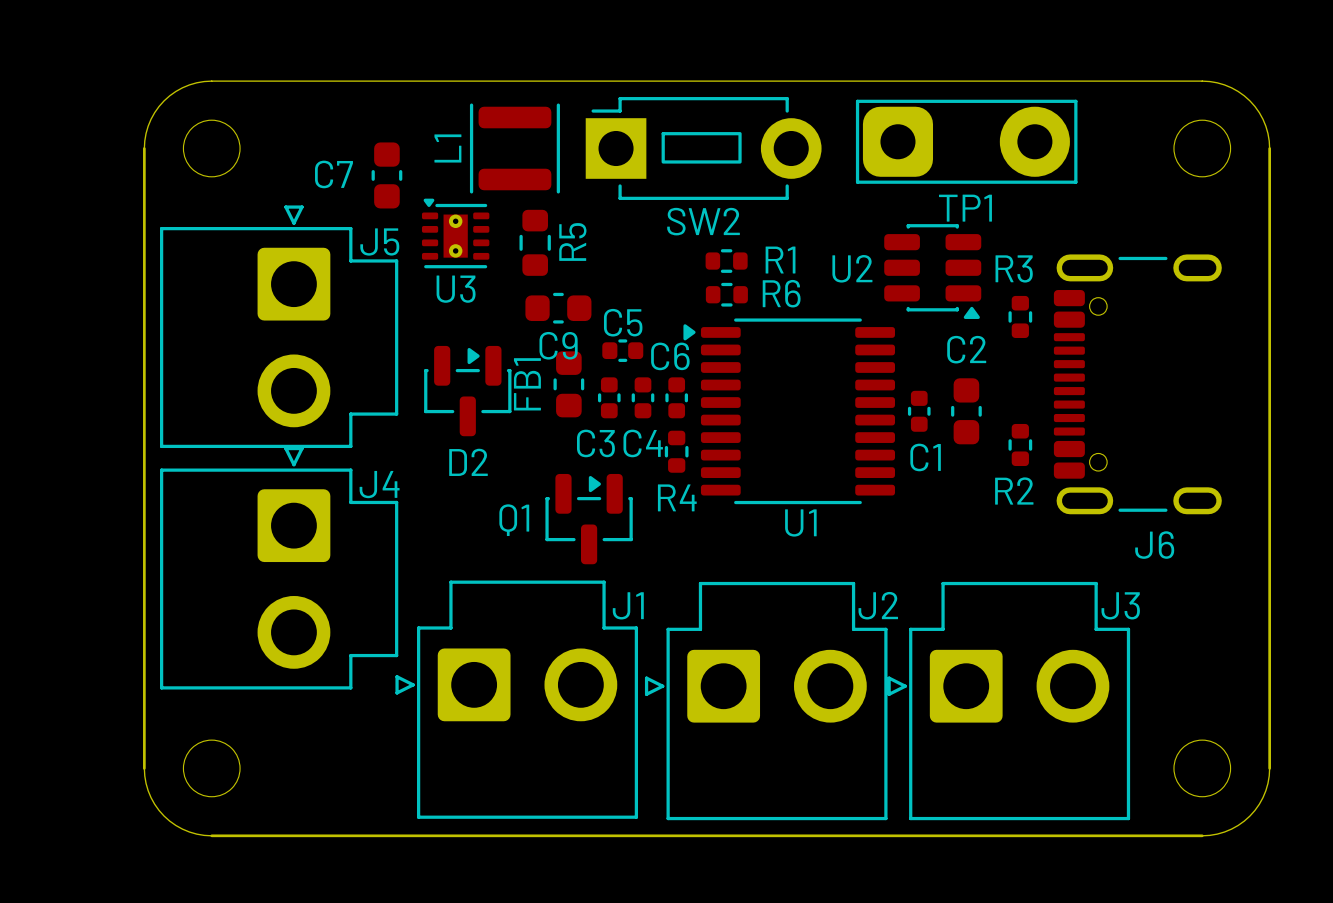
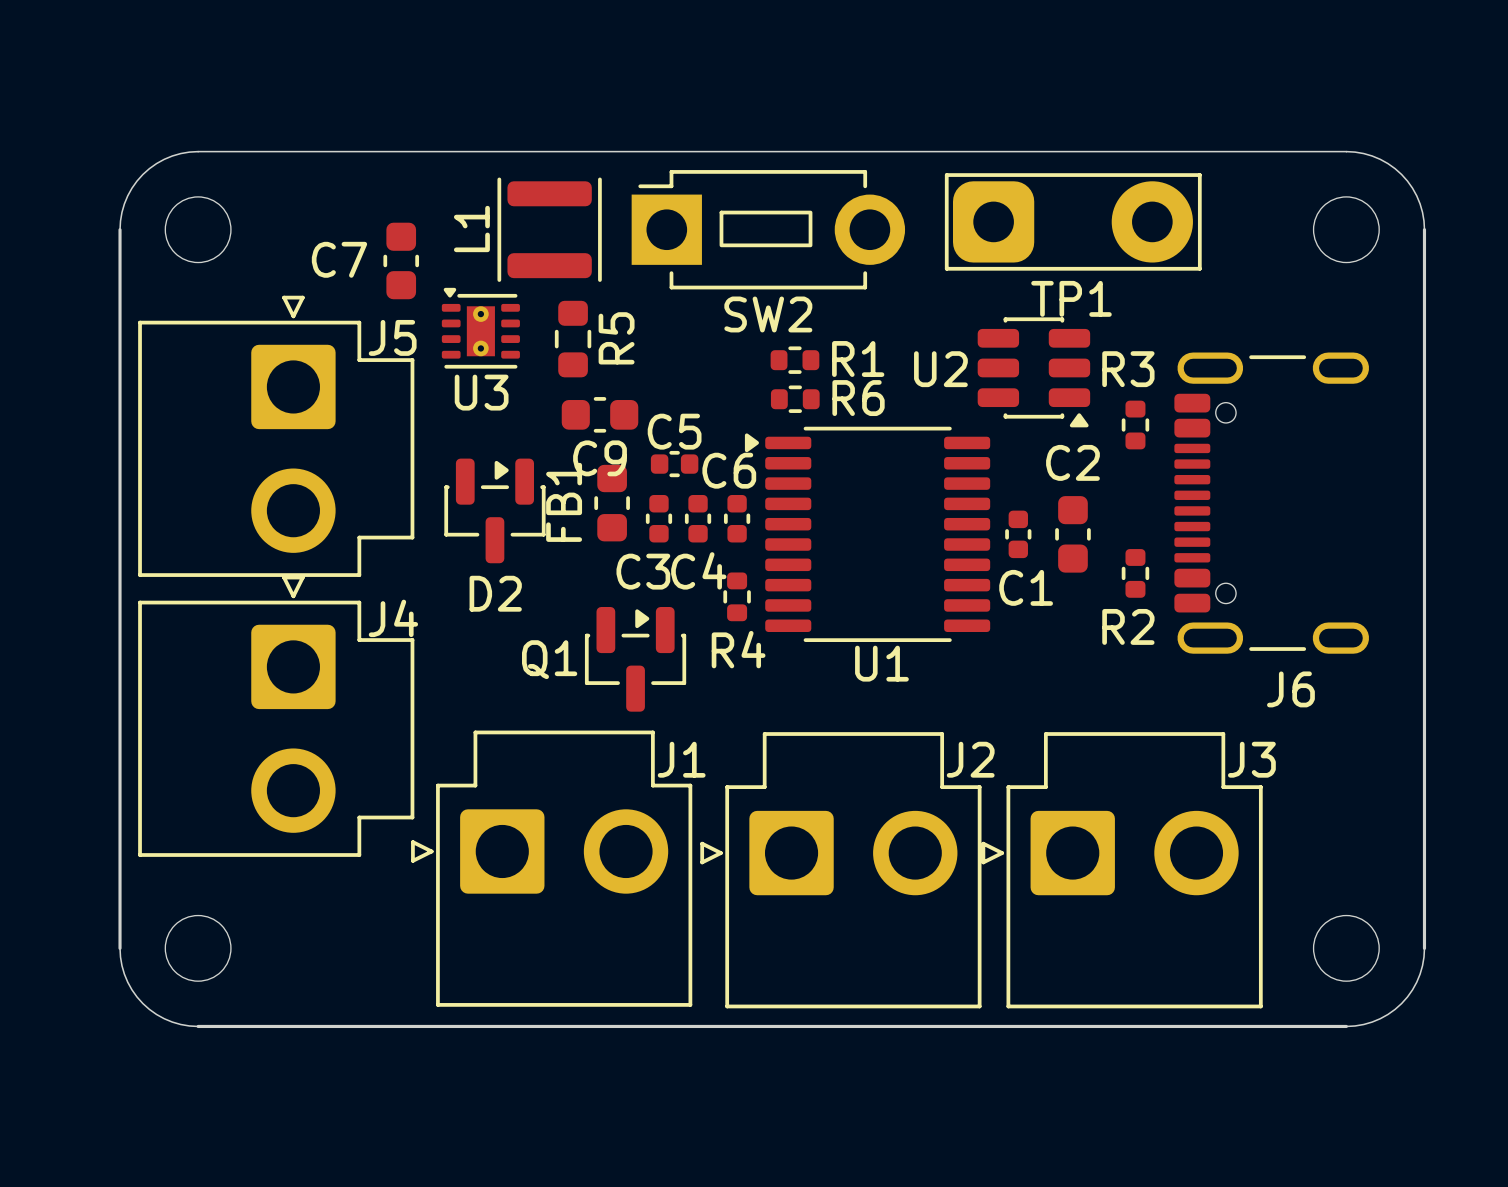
R4 position: (676, 451) -> (737, 596)

